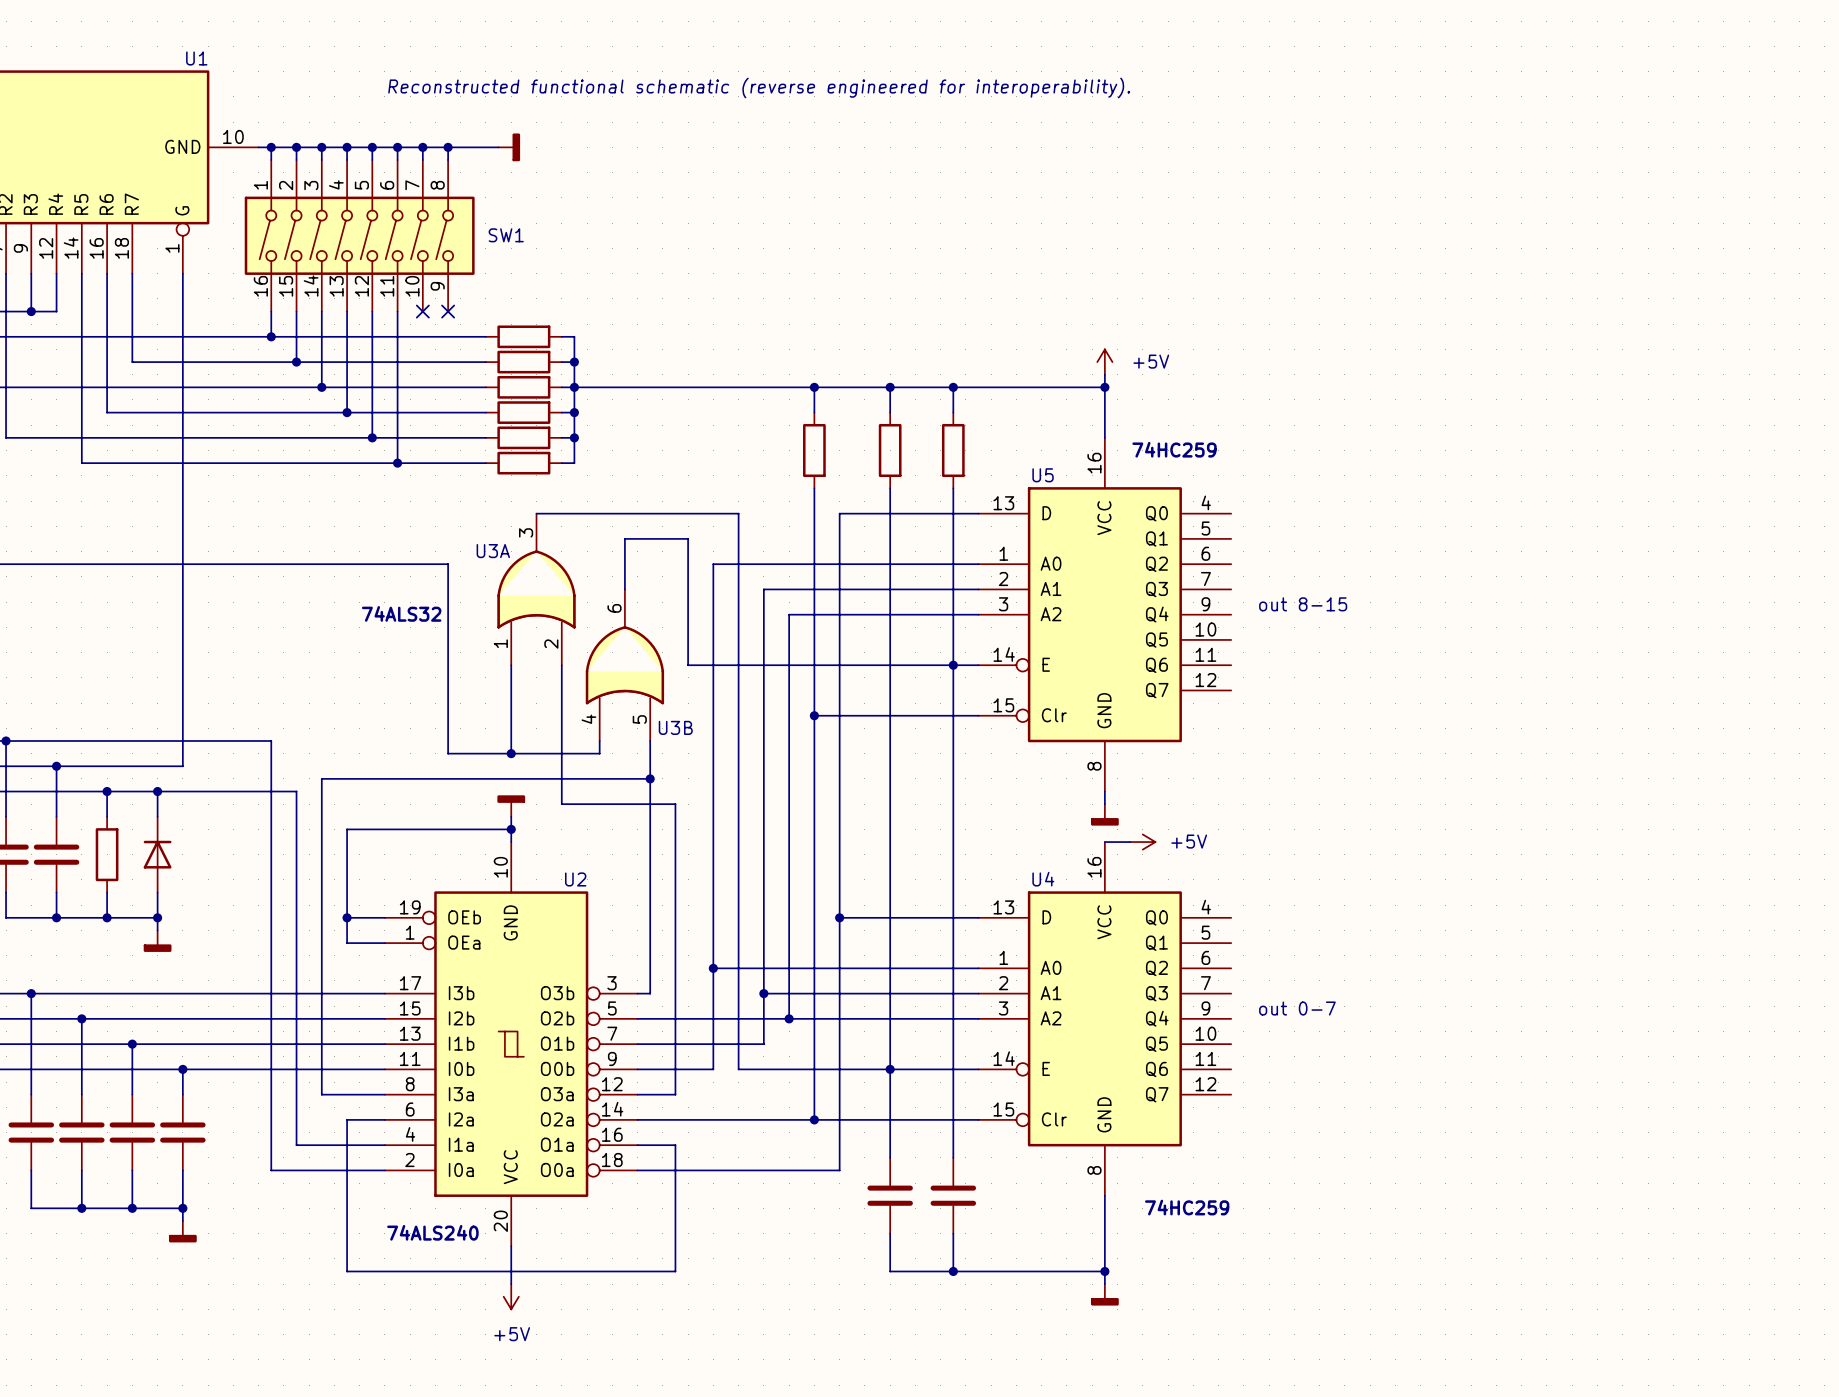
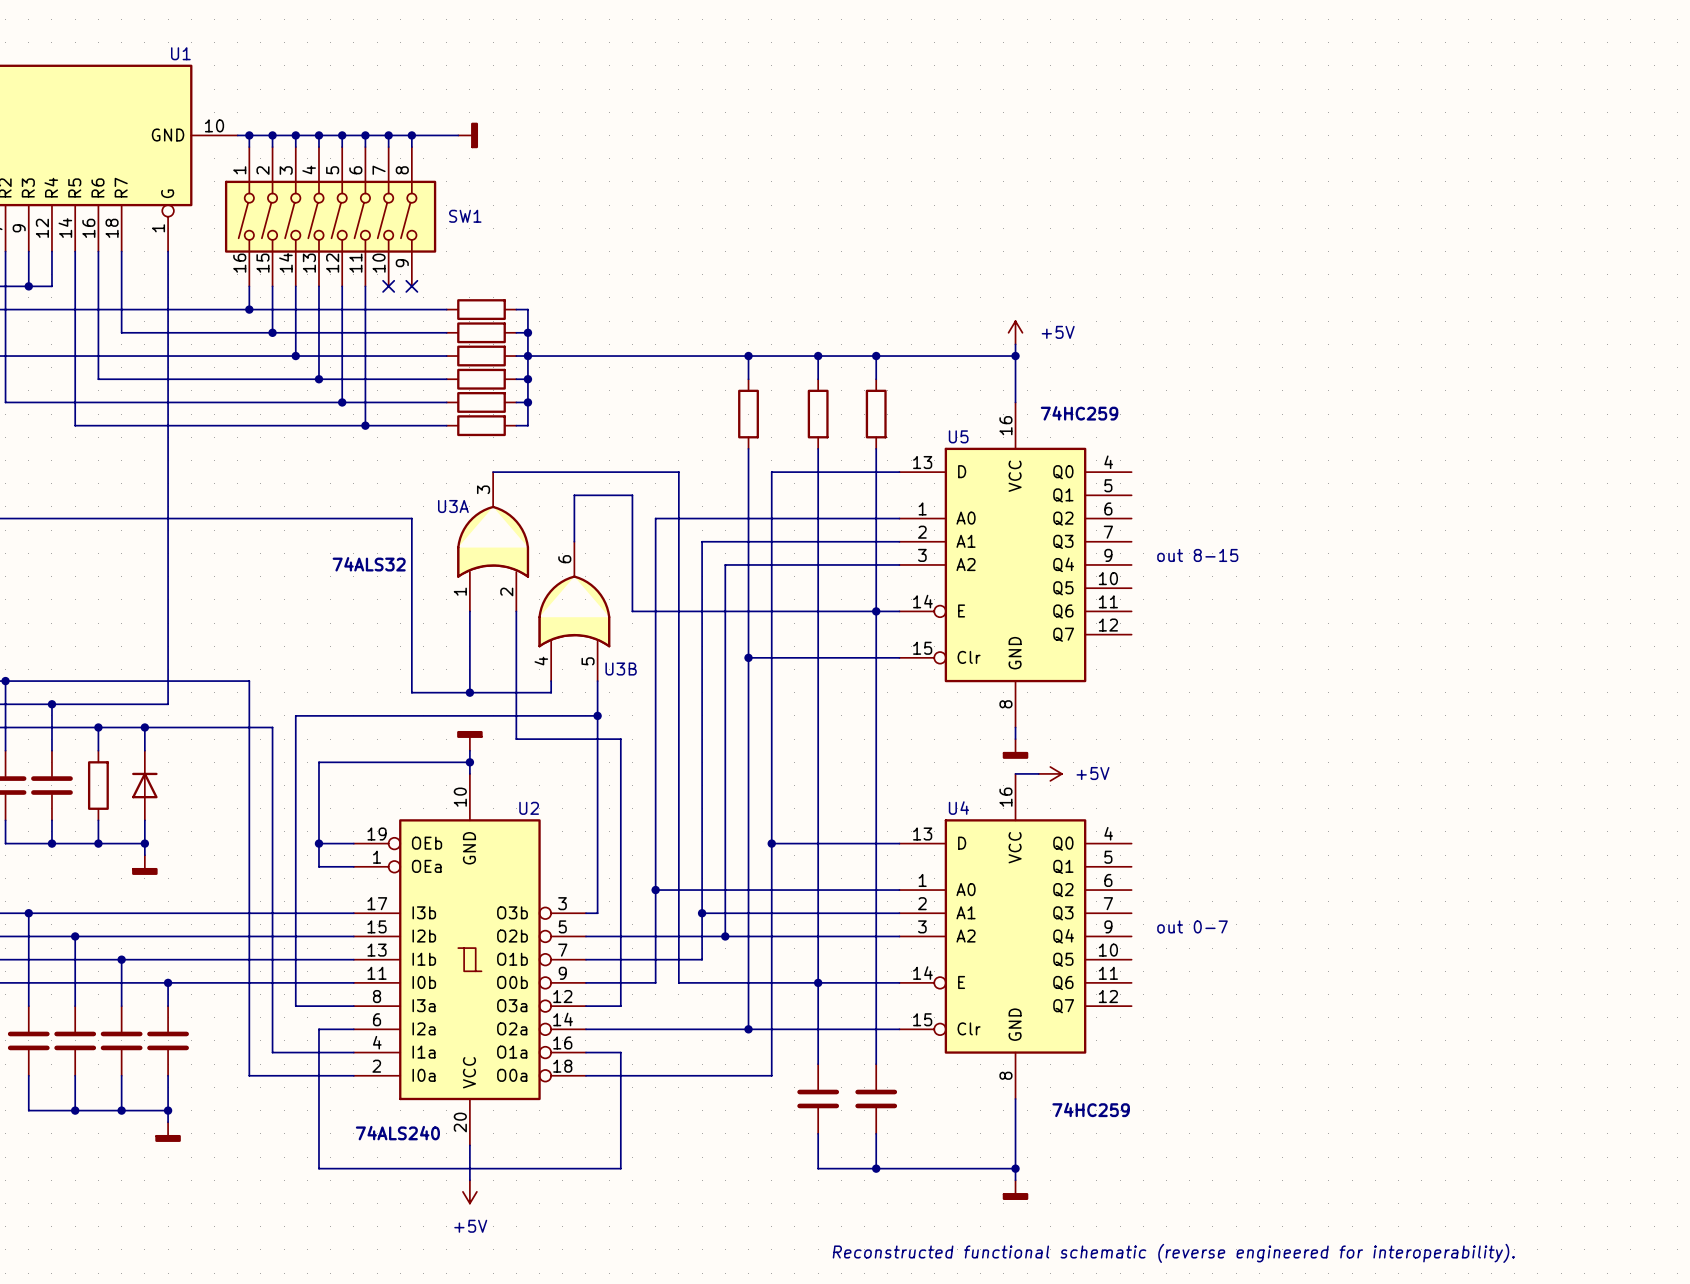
text: Reconstructed functional schematic (reverse engineered for interoperability). (759, 88) -> none
text: none -> Reconstructed functional schematic (reverse engineered for interoperability). (1173, 1253)

